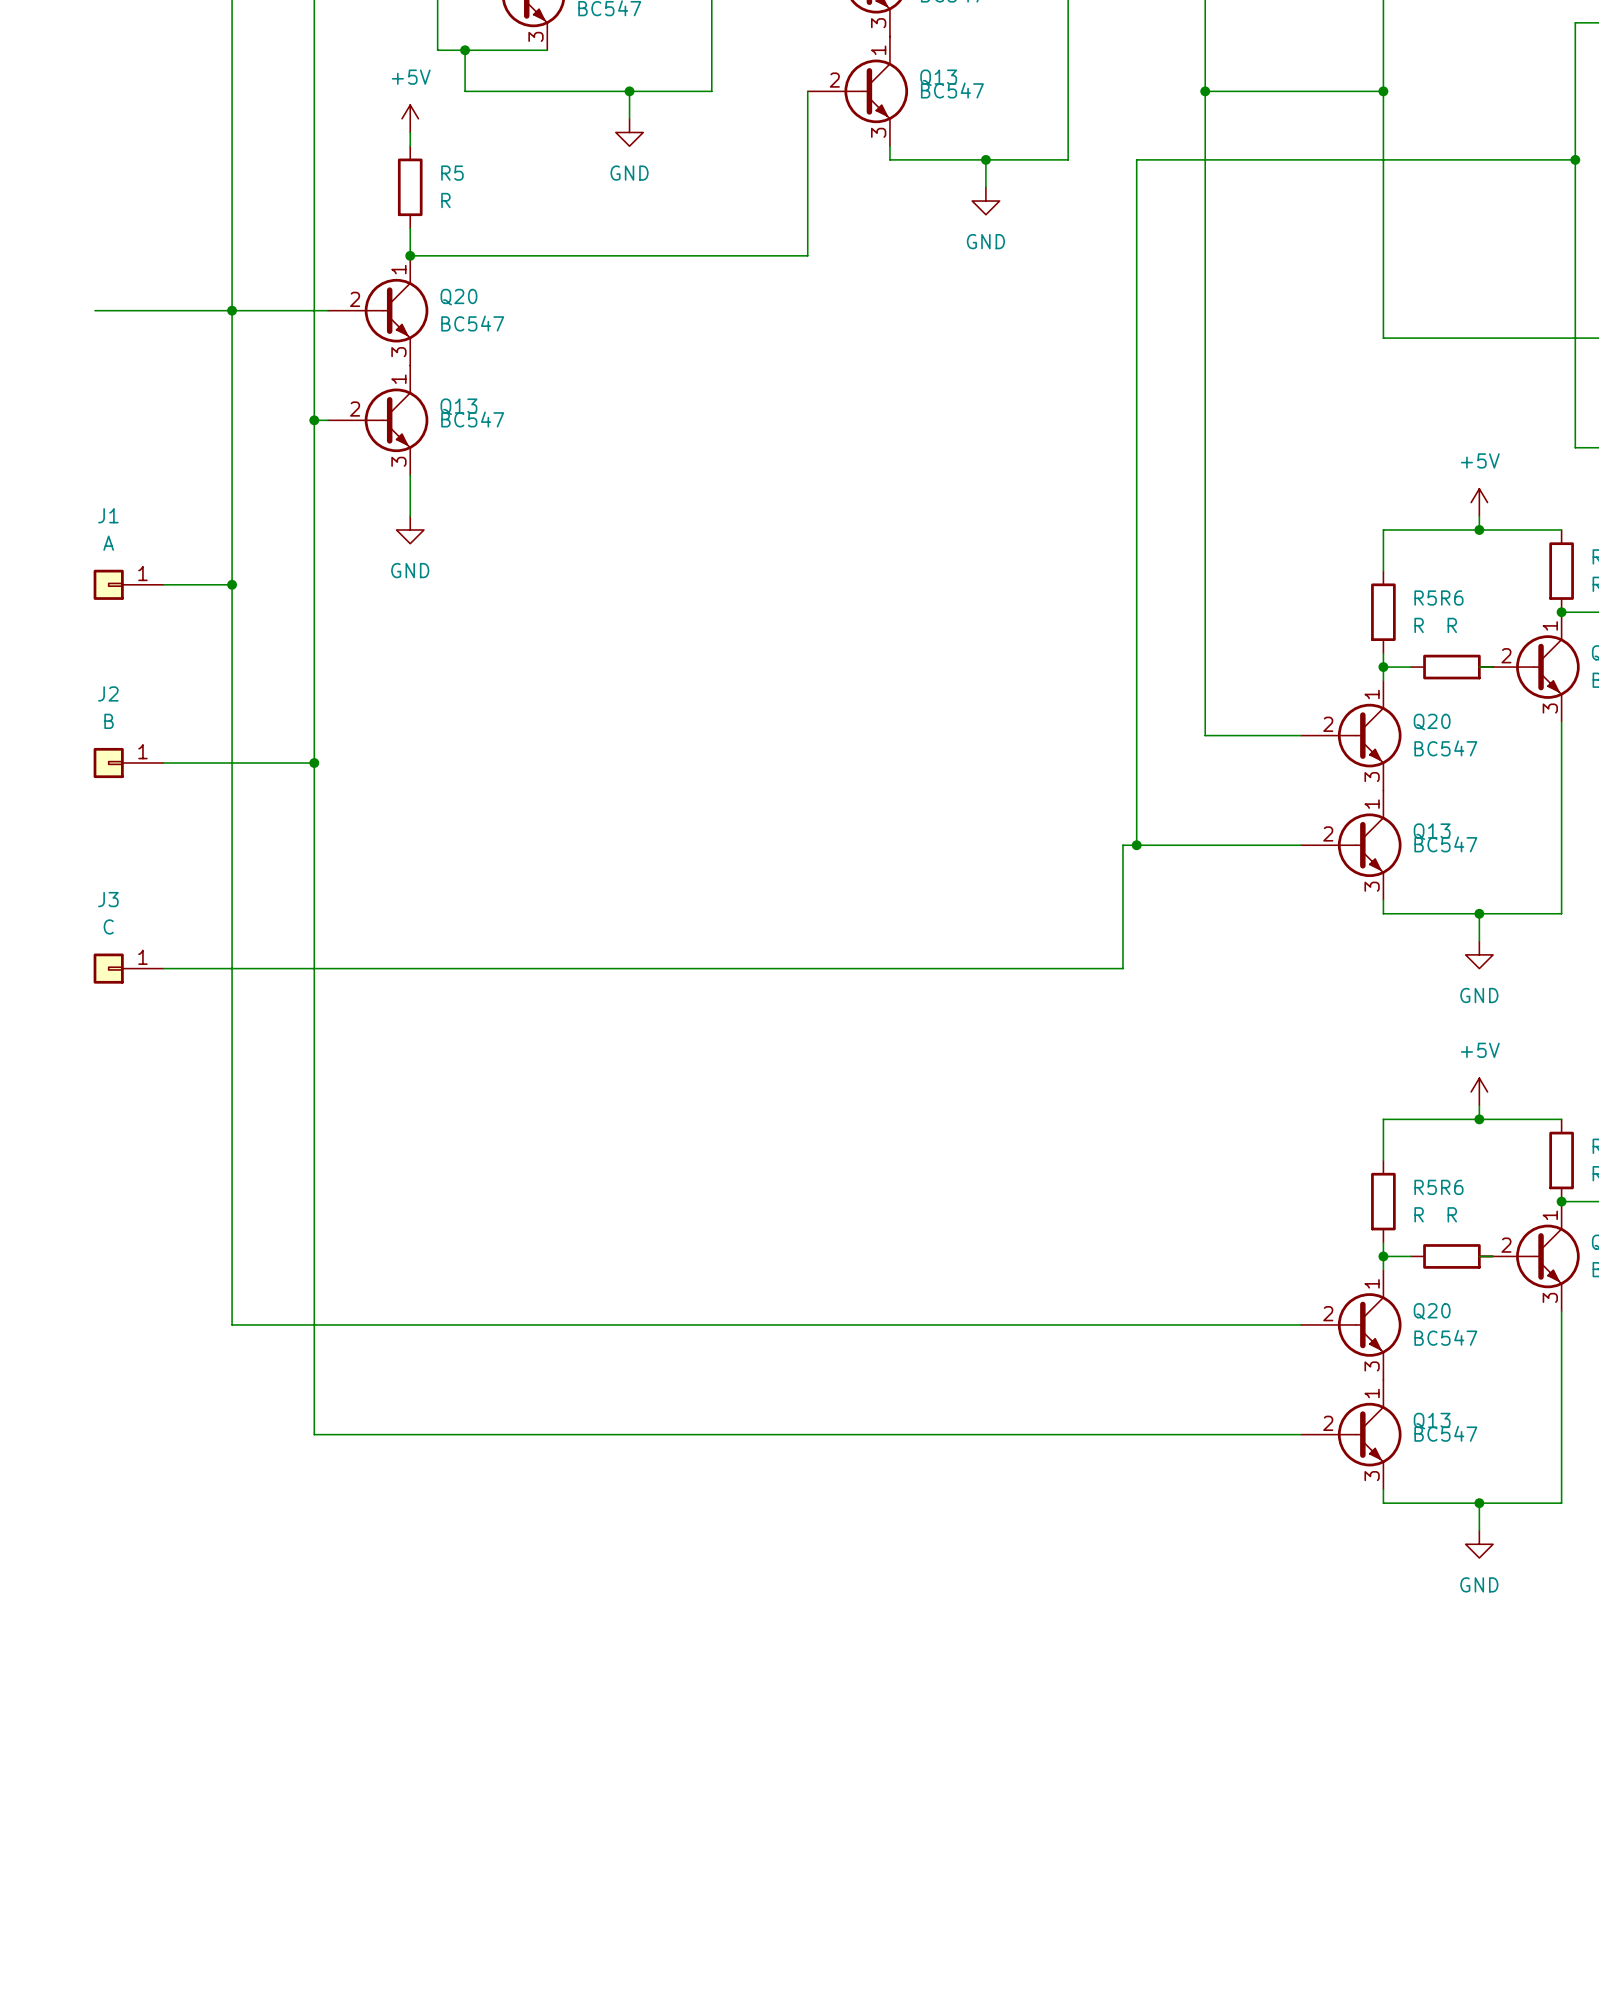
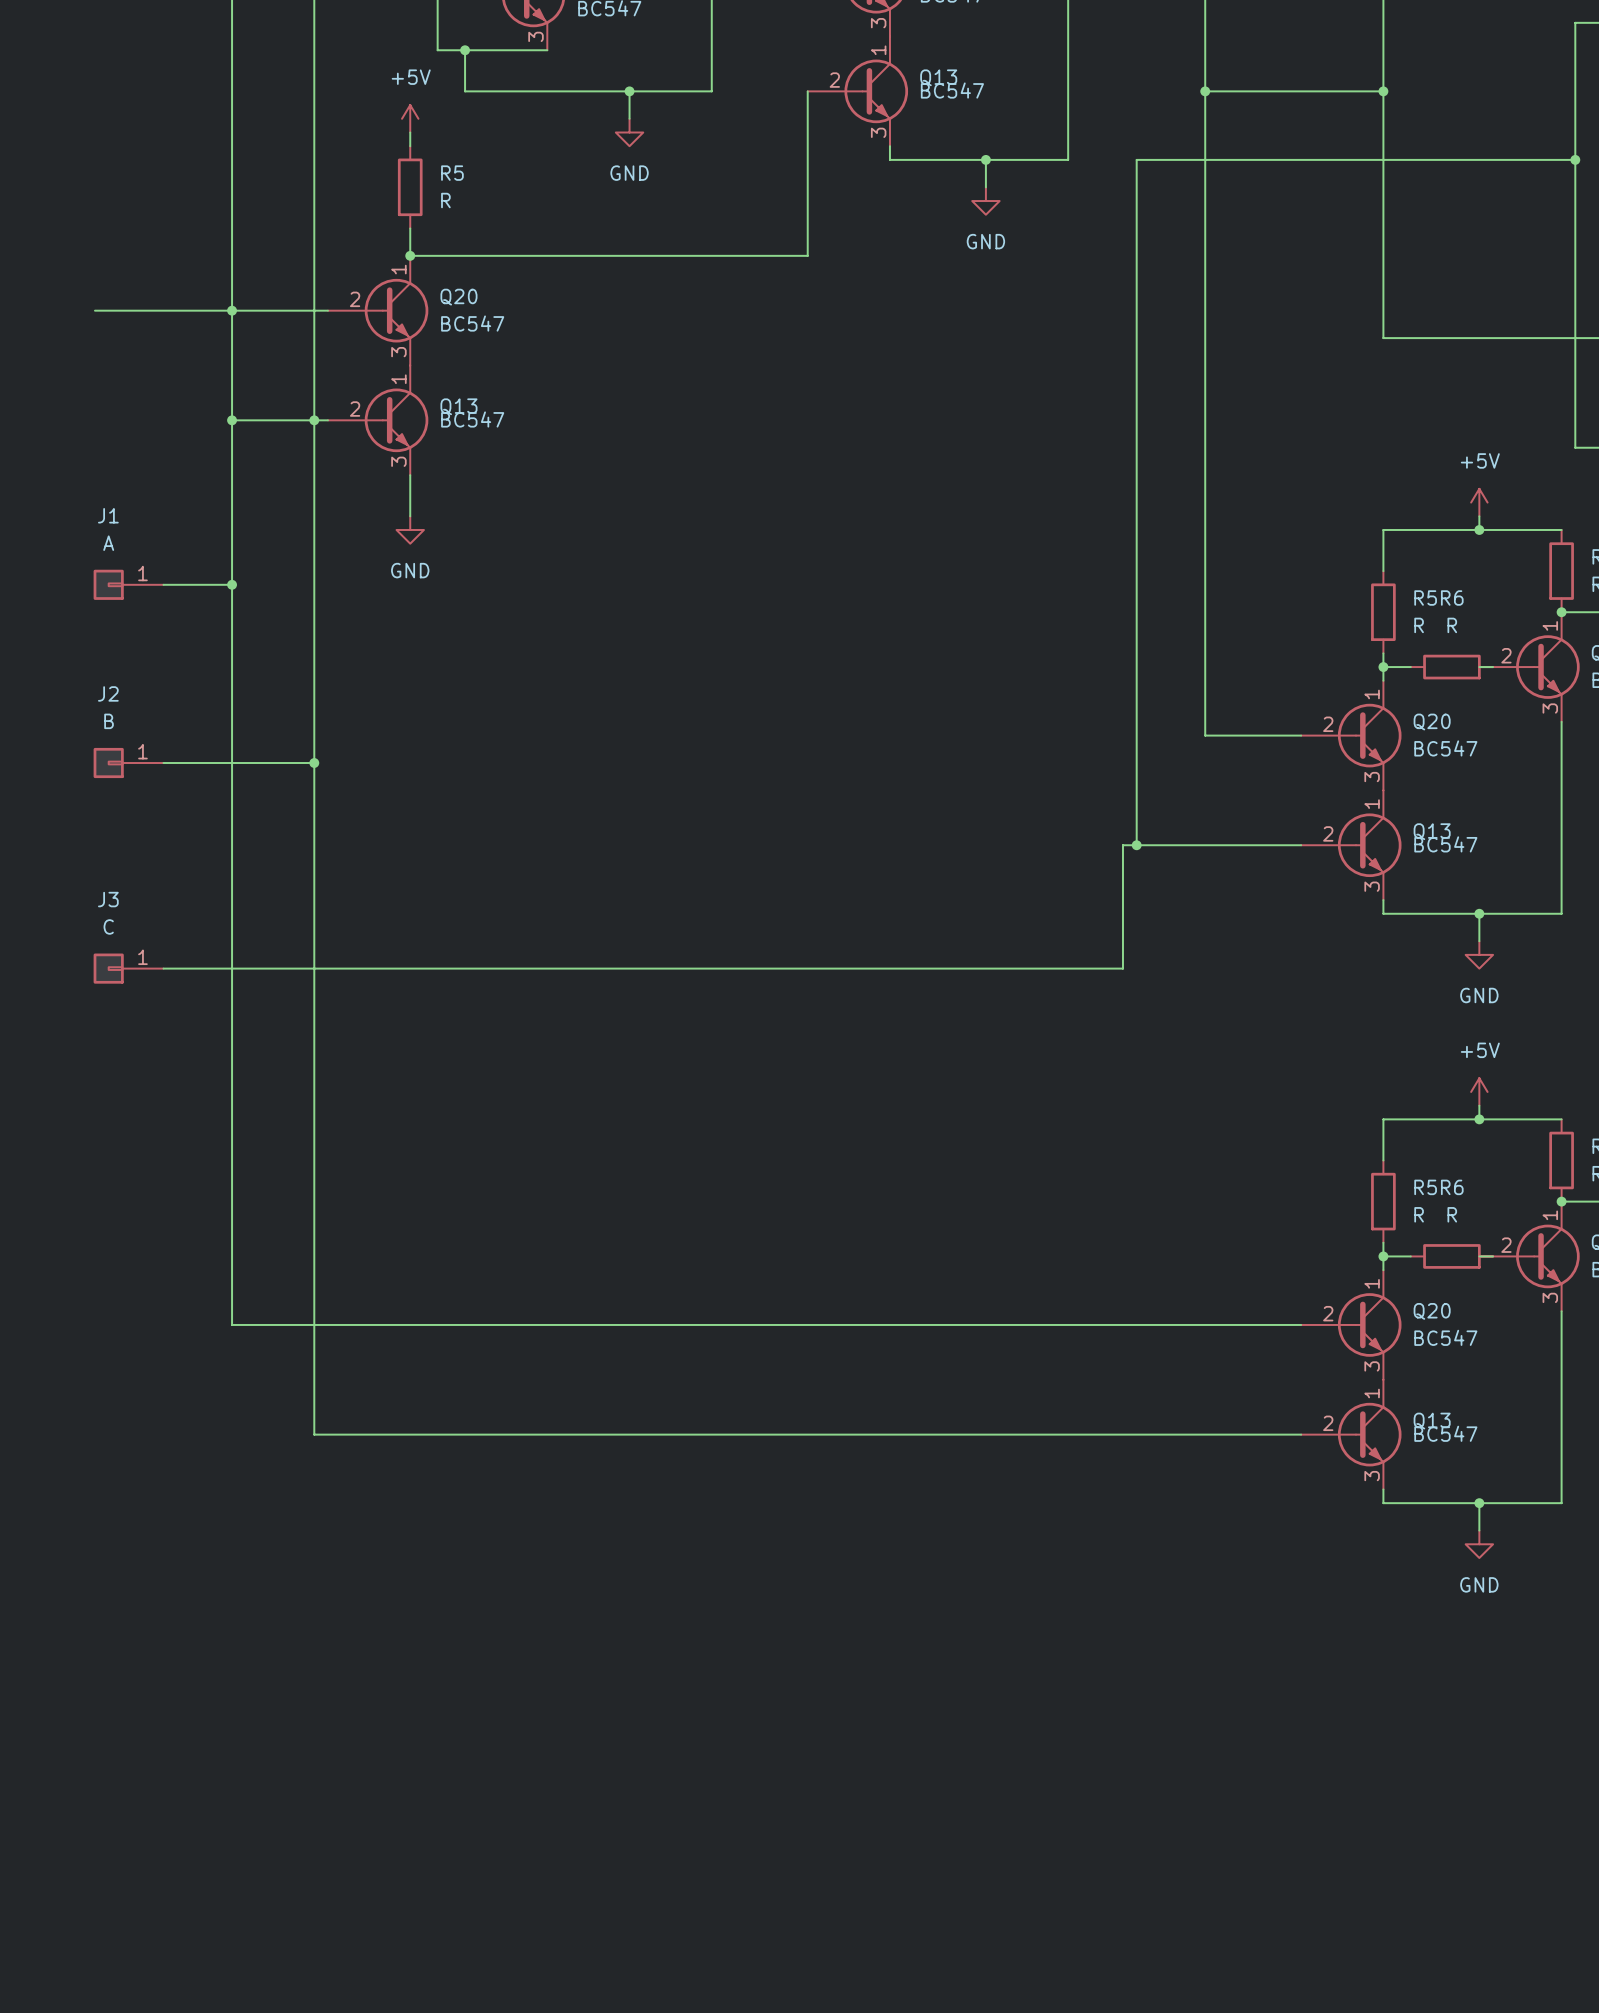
wire: none -> (232, 420) (314, 420)
junction: none -> (232, 420)

